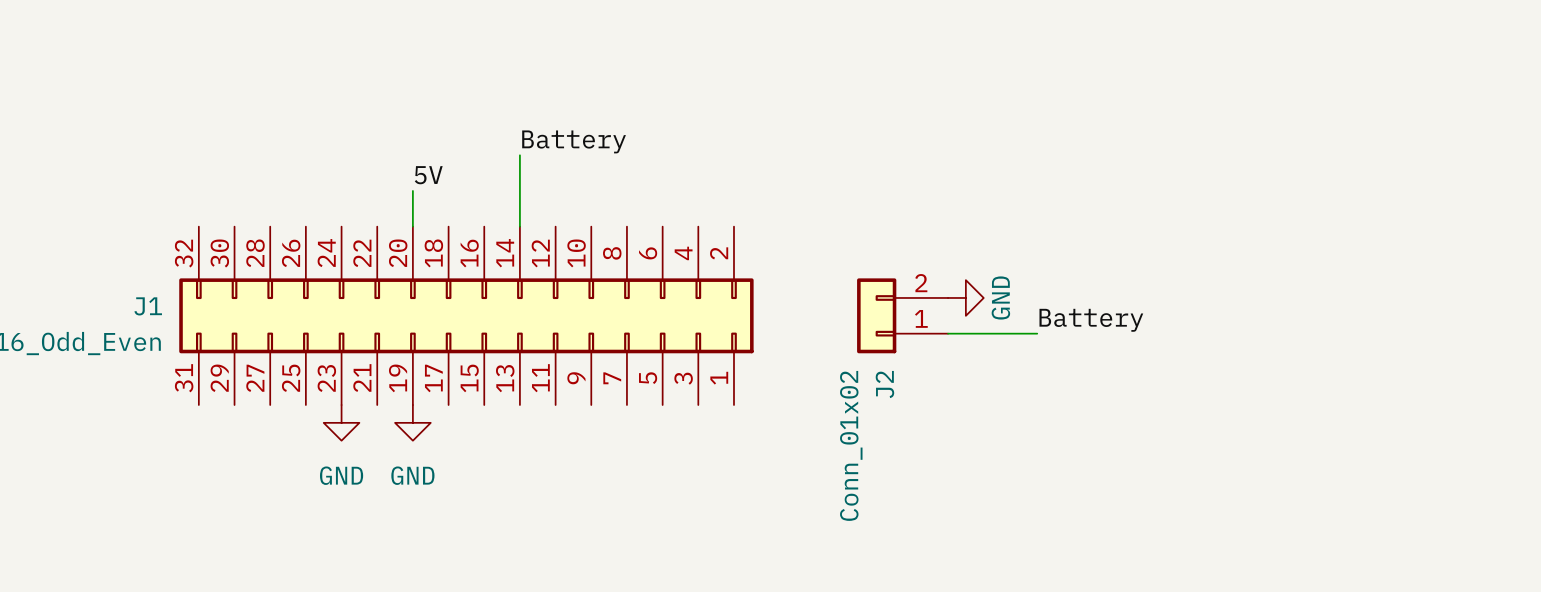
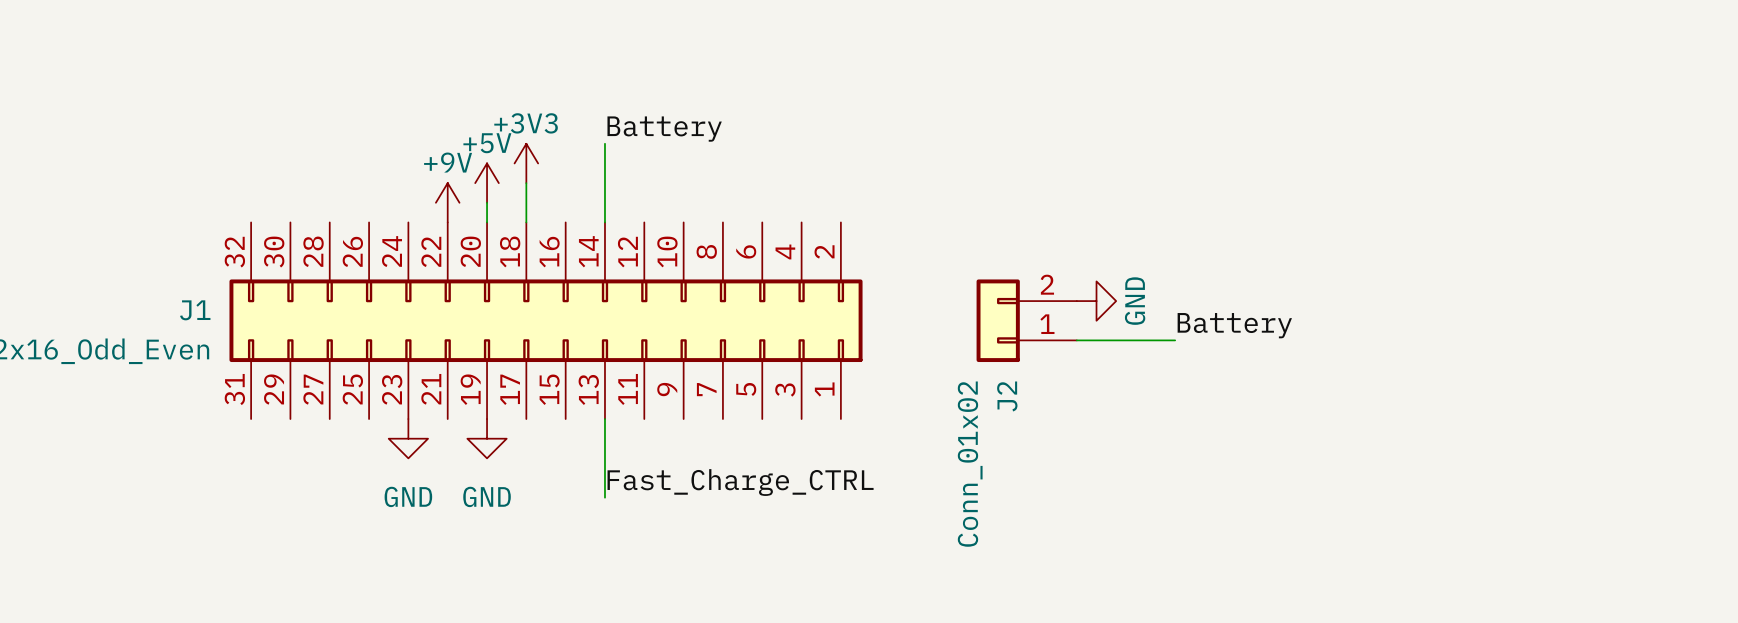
power symbol: none -> +3V3 (526, 163)
label: 5V (428, 175) -> none
power symbol: none -> +5V (487, 183)
wire: none -> (526, 183) (526, 222)
power symbol: none -> +9V (447, 202)
wire: none -> (604, 419) (604, 497)
label: none -> Fast_Charge_CTRL (740, 482)

